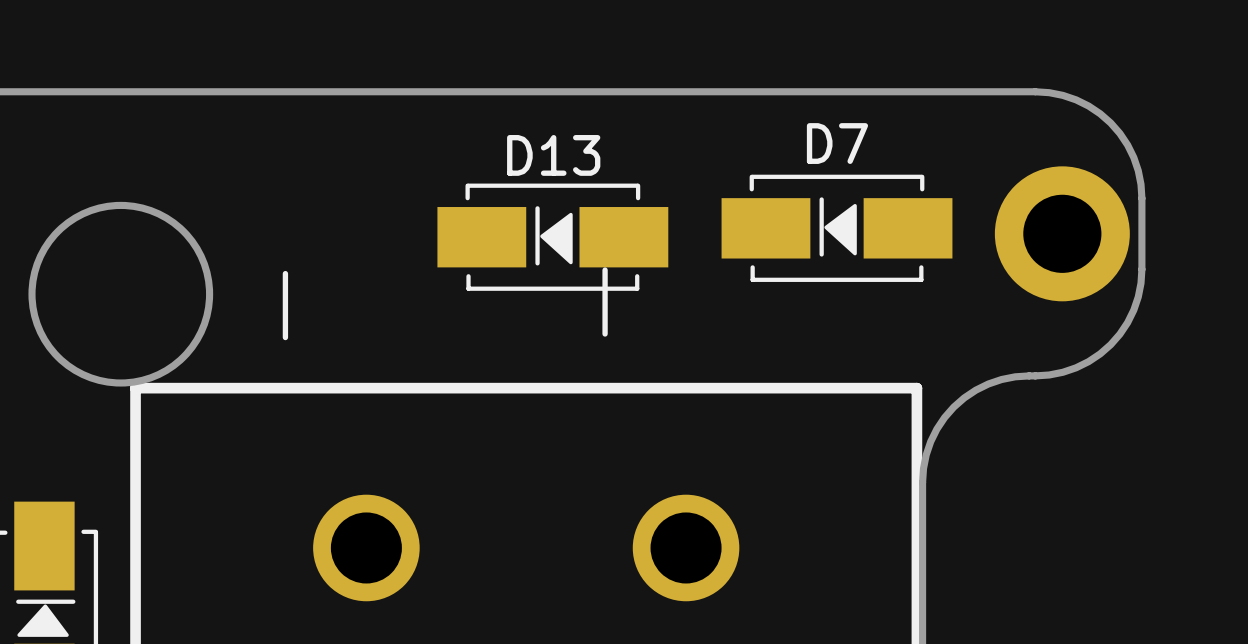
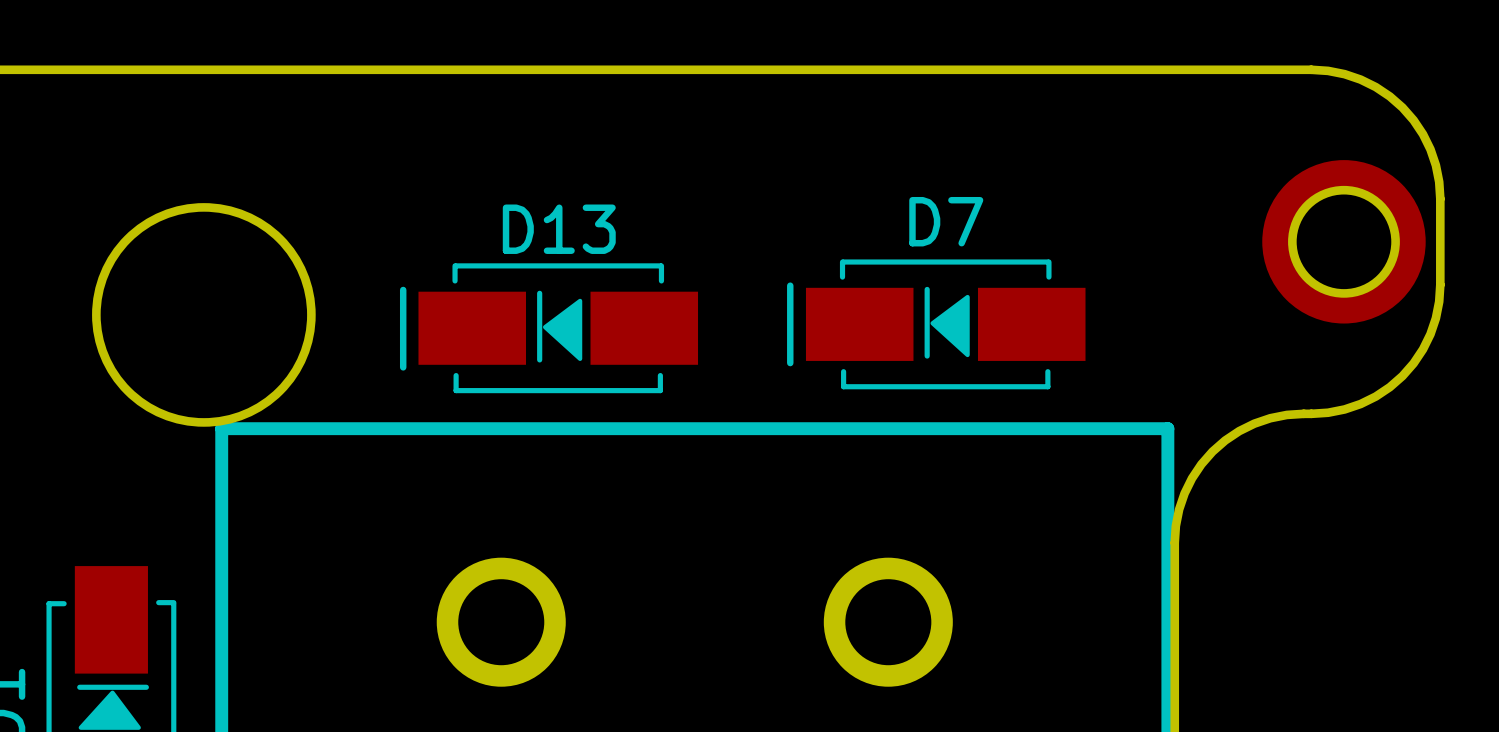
D7 position: (837, 228) -> (945, 324)
D13 position: (552, 237) -> (558, 328)

